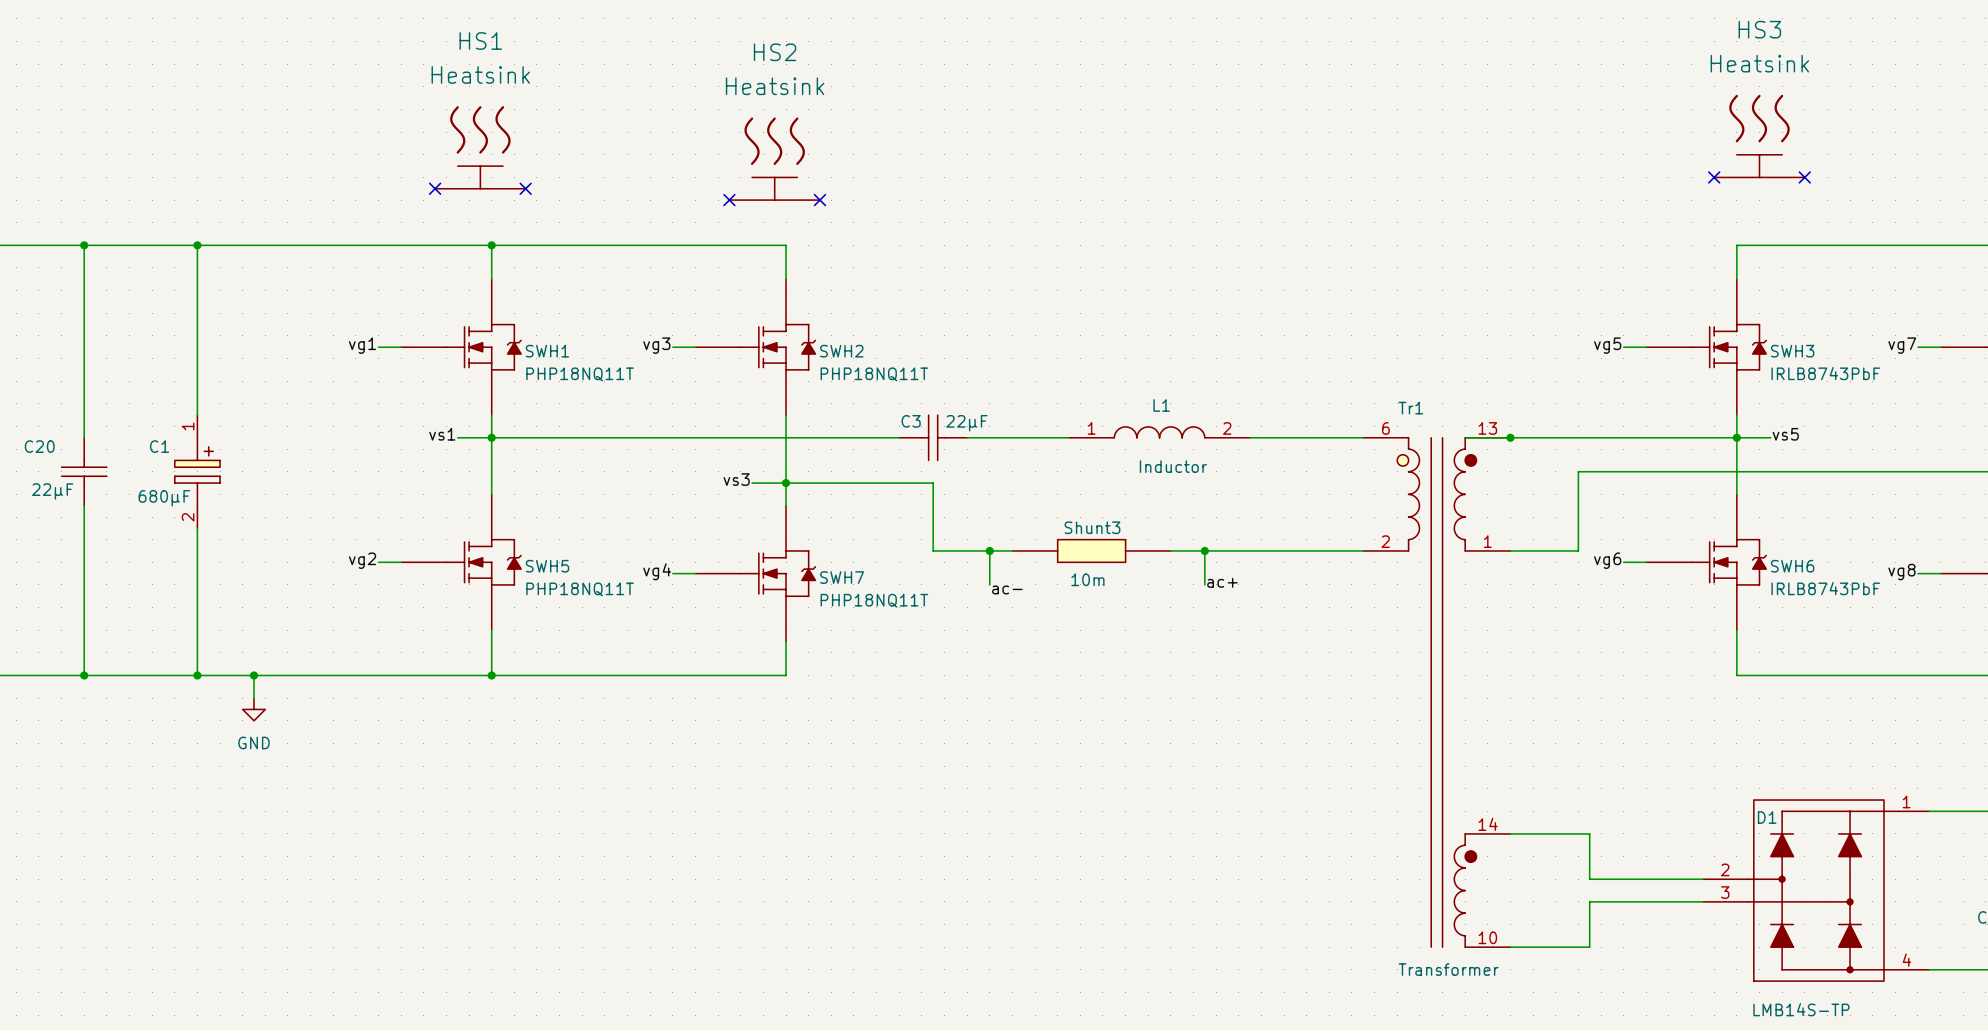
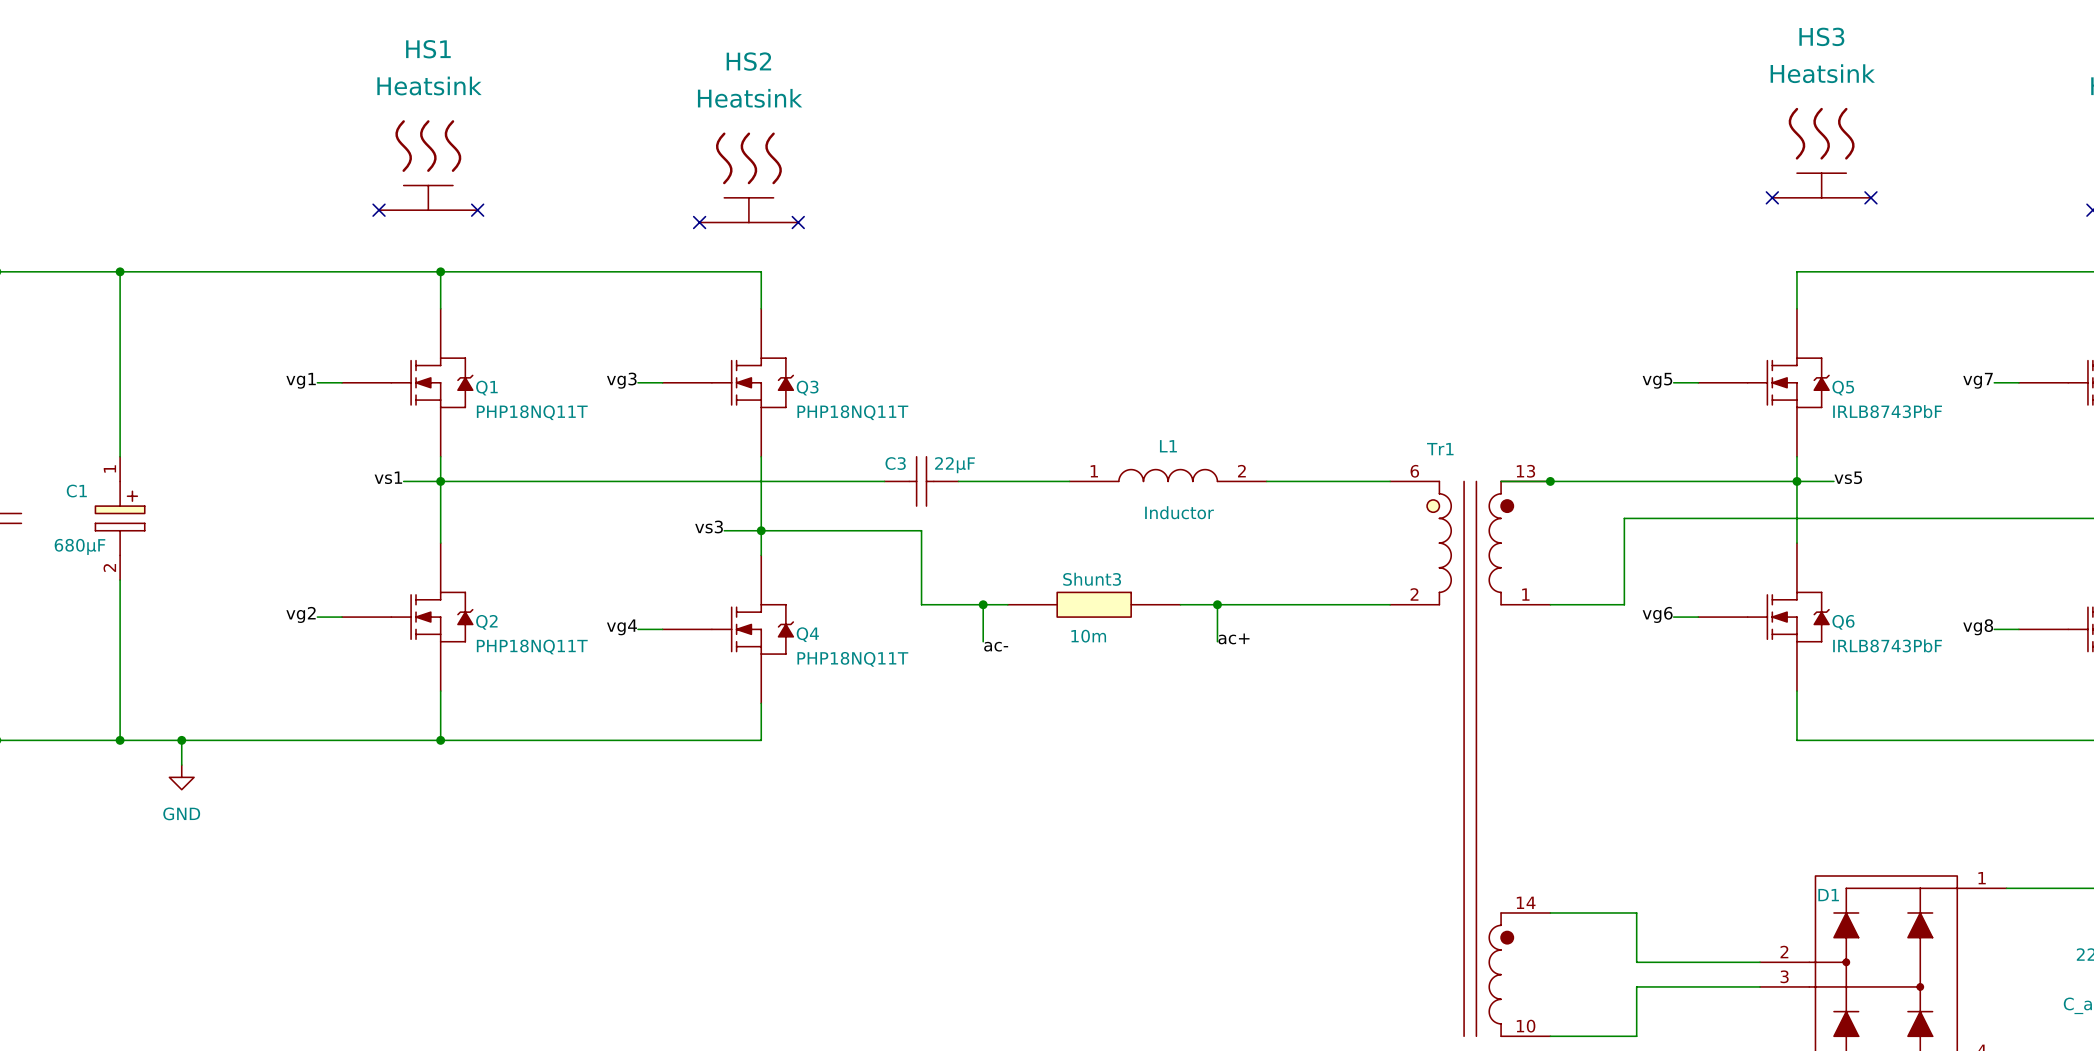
SWH1 name: SWH1 (547, 351) -> Q1 (486, 388)
SWH2 name: SWH2 (841, 351) -> Q3 (807, 388)
SWH3 name: SWH3 (1792, 351) -> Q5 (1843, 388)
SWH5 name: SWH5 (547, 566) -> Q2 (486, 622)
SWH6 name: SWH6 (1792, 566) -> Q6 (1843, 622)
SWH7 name: SWH7 (842, 577) -> Q4 (807, 634)

